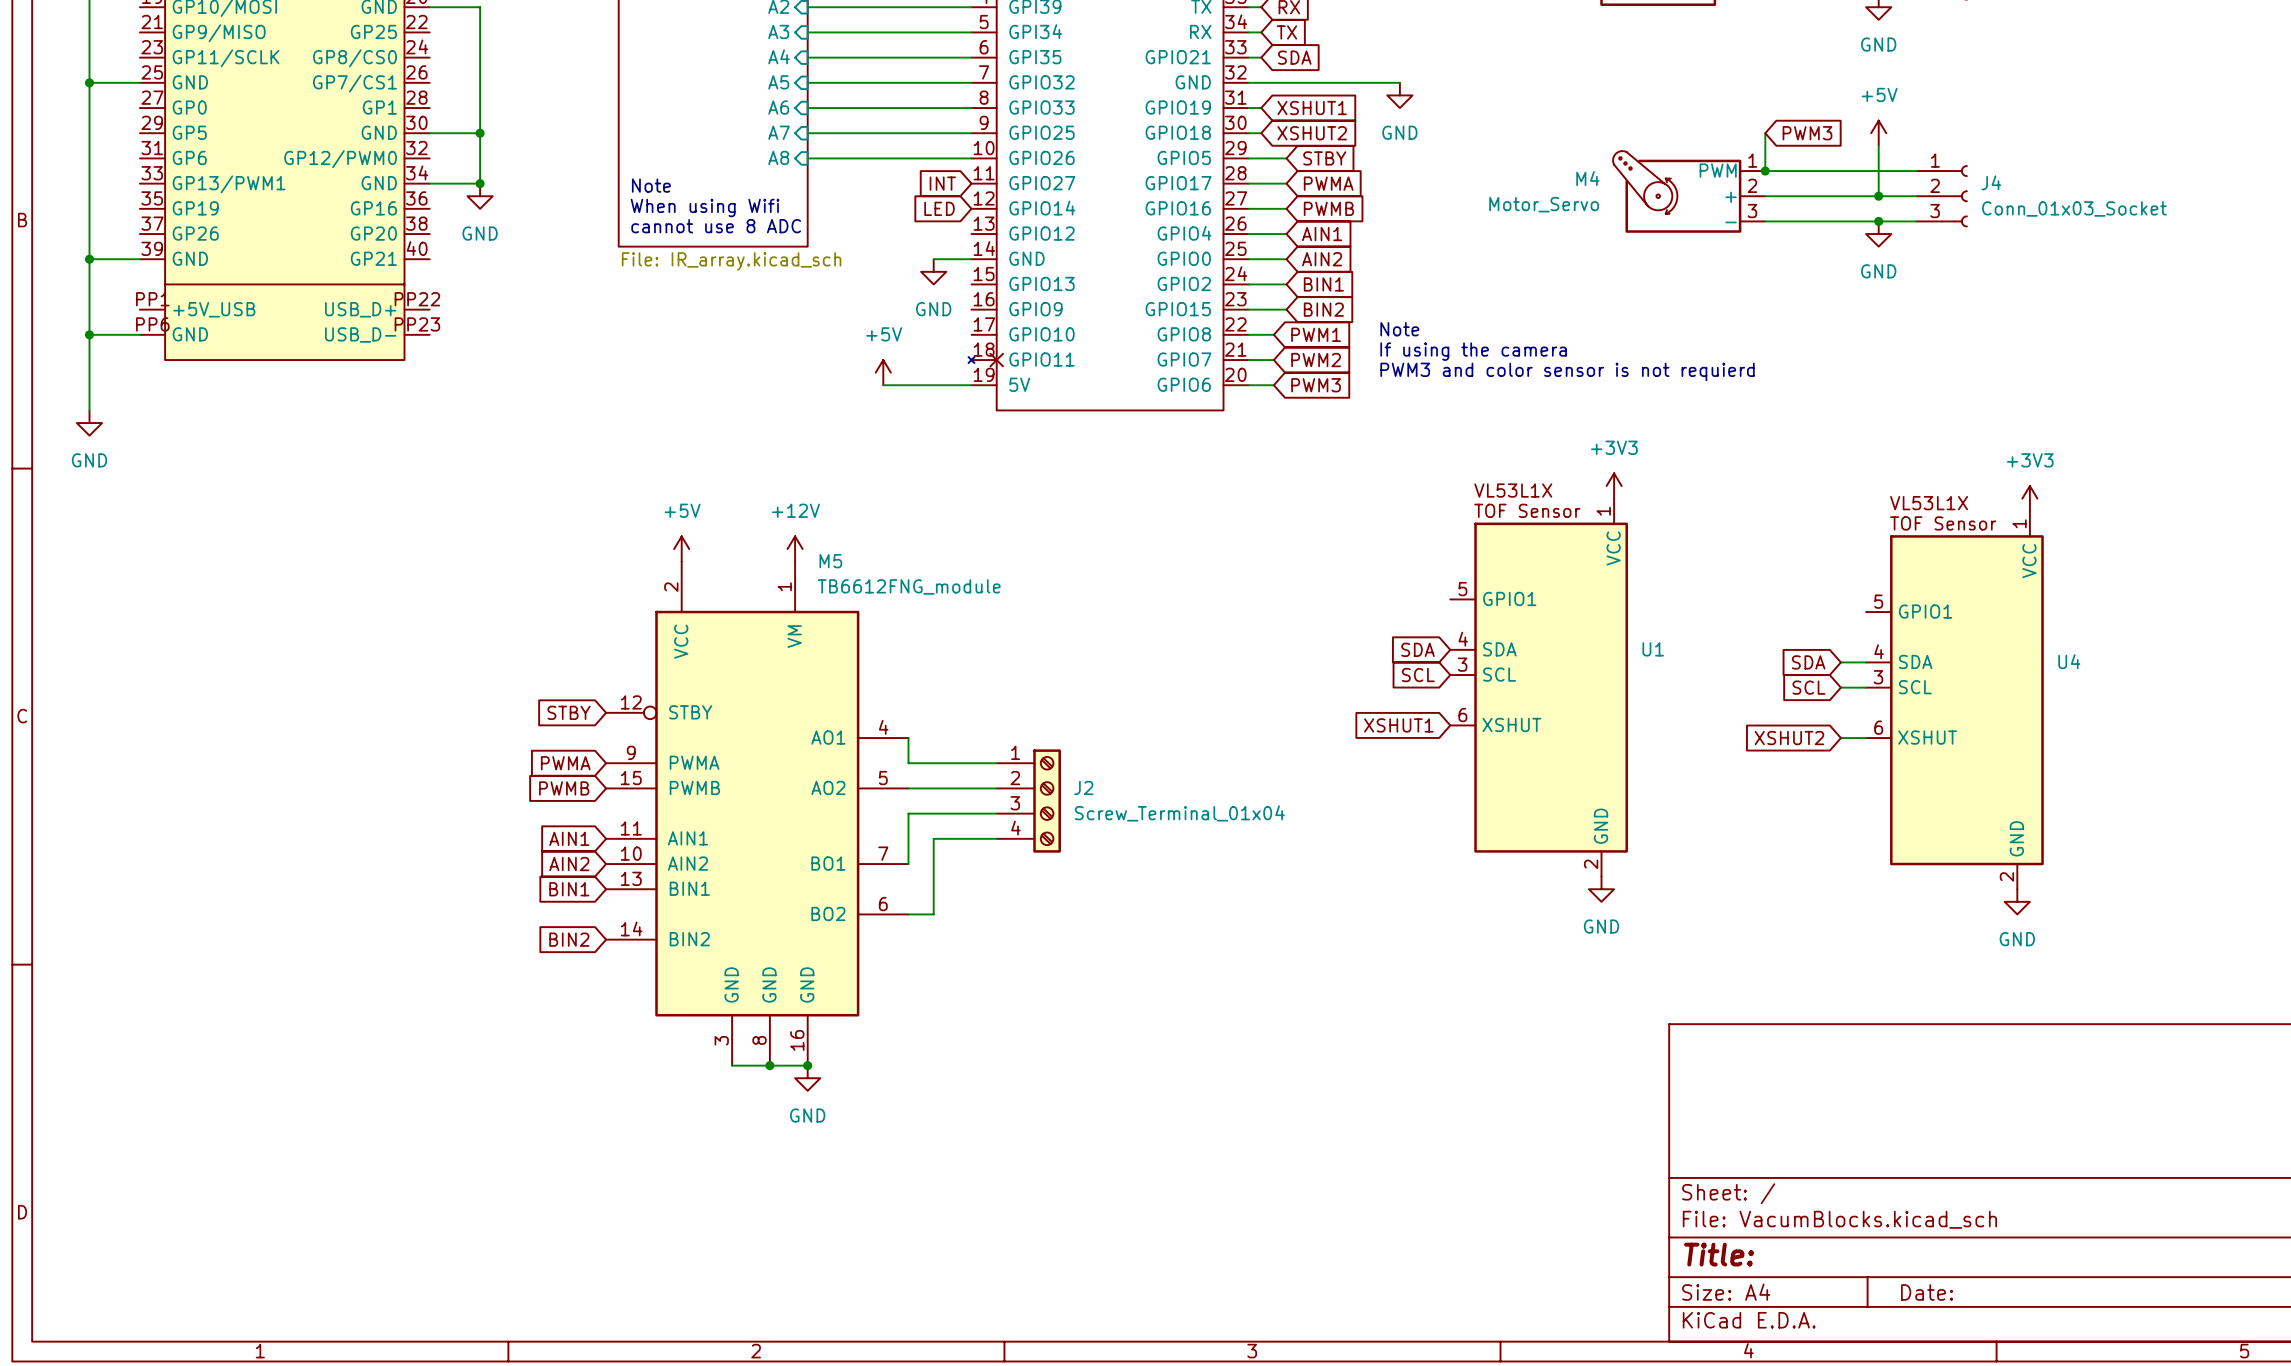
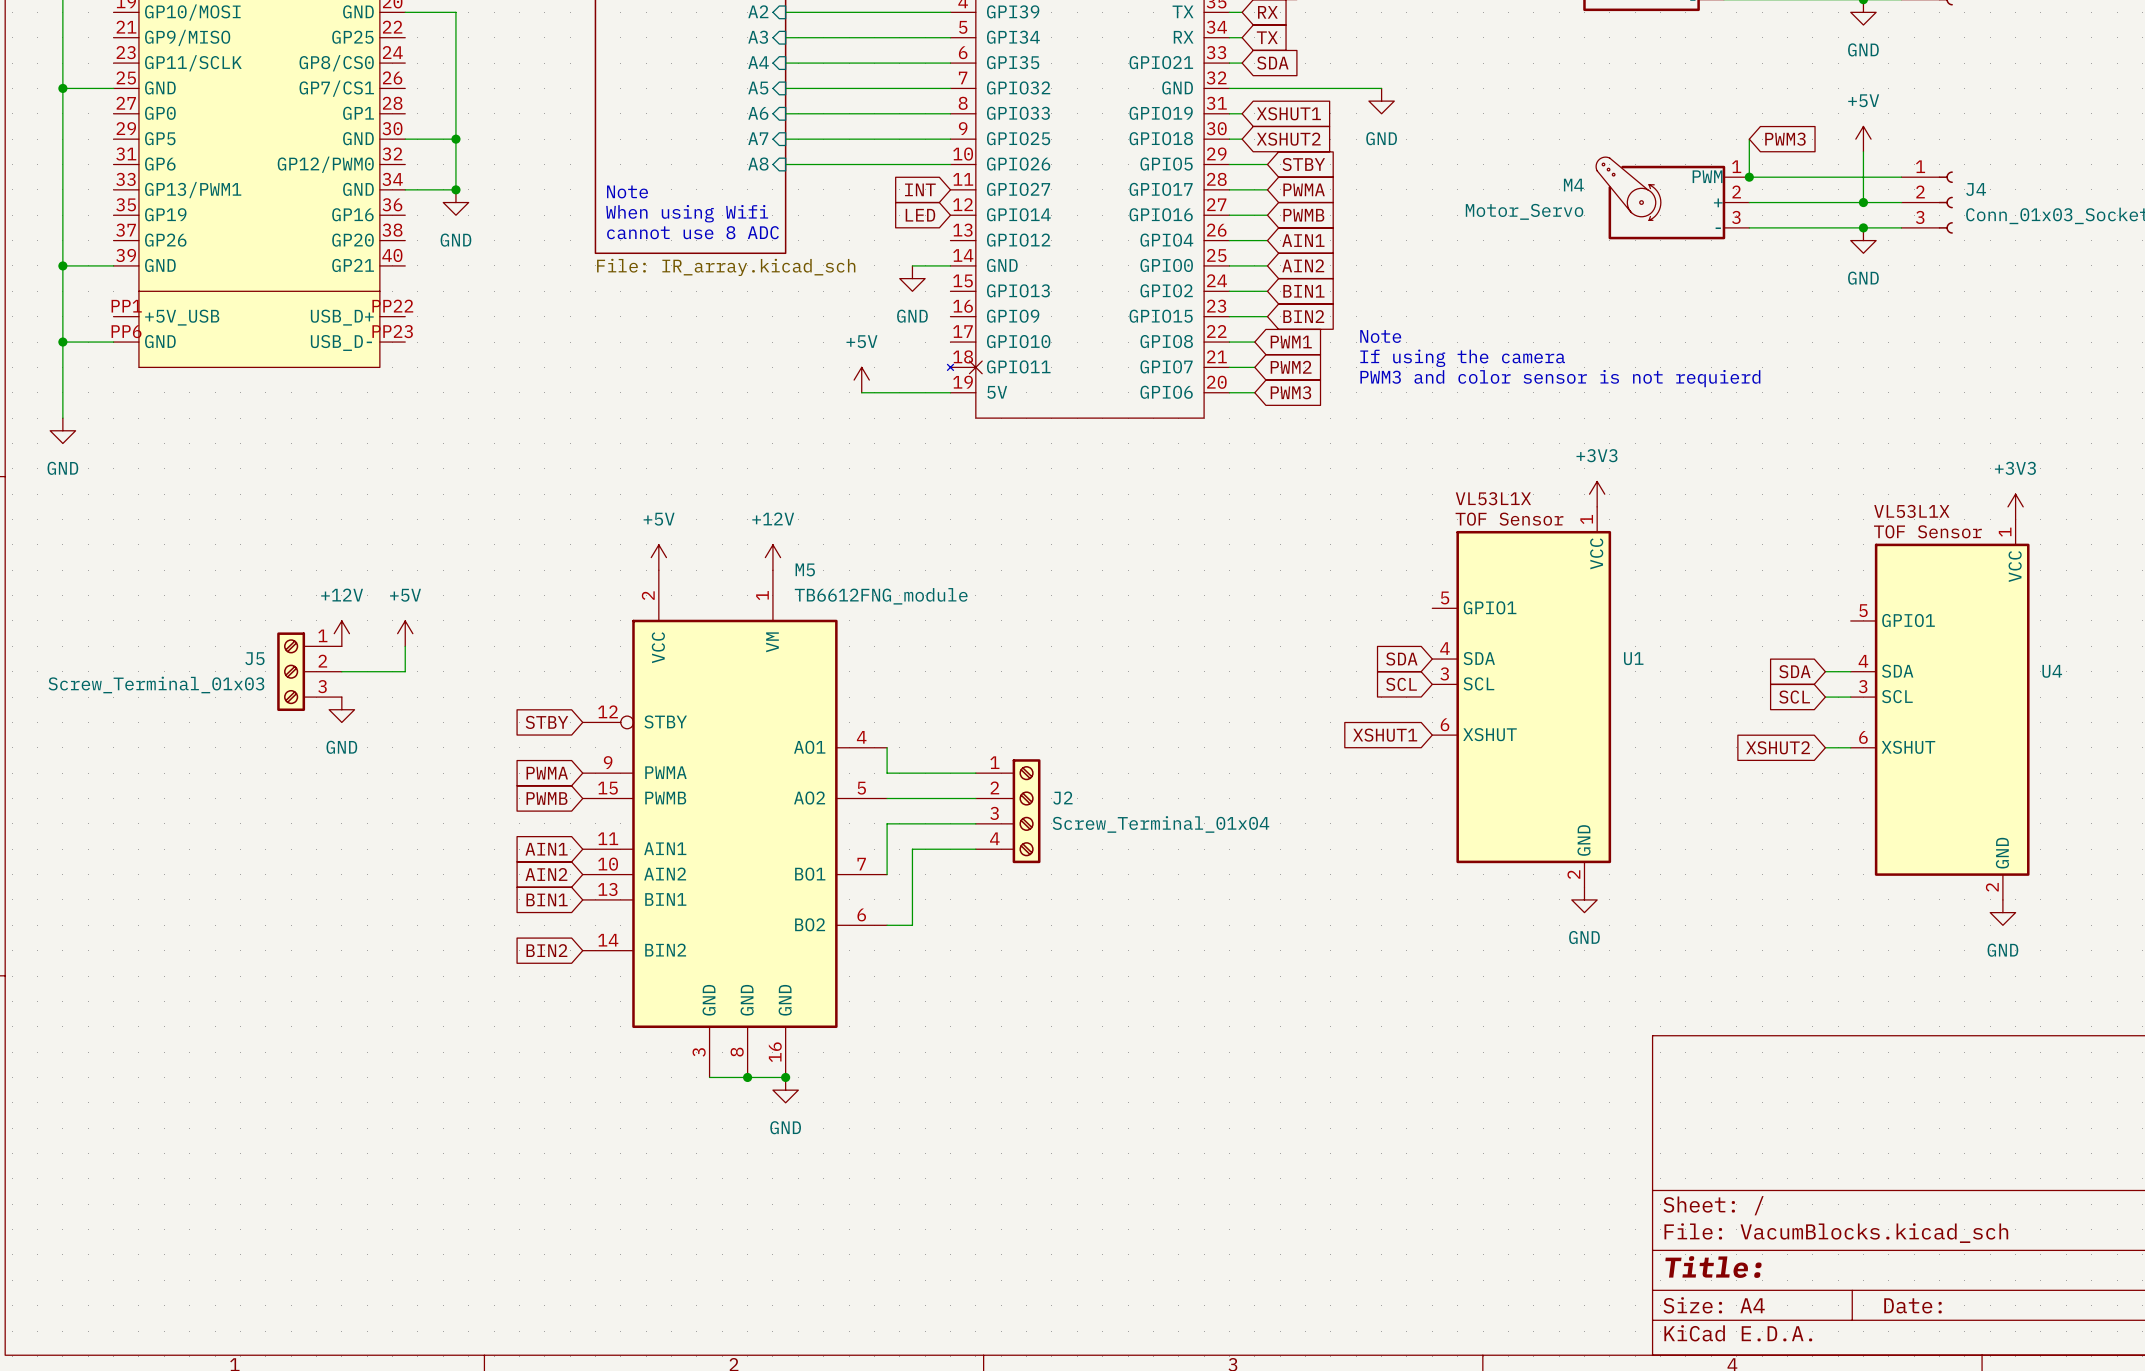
power symbol: none -> +12V (341, 633)
power symbol: none -> +5V (405, 633)
wire: none -> (405, 646) (405, 671) (341, 671)
J5: none -> Screw_Terminal_01x03 (309, 671)
power symbol: none -> GND (341, 709)

